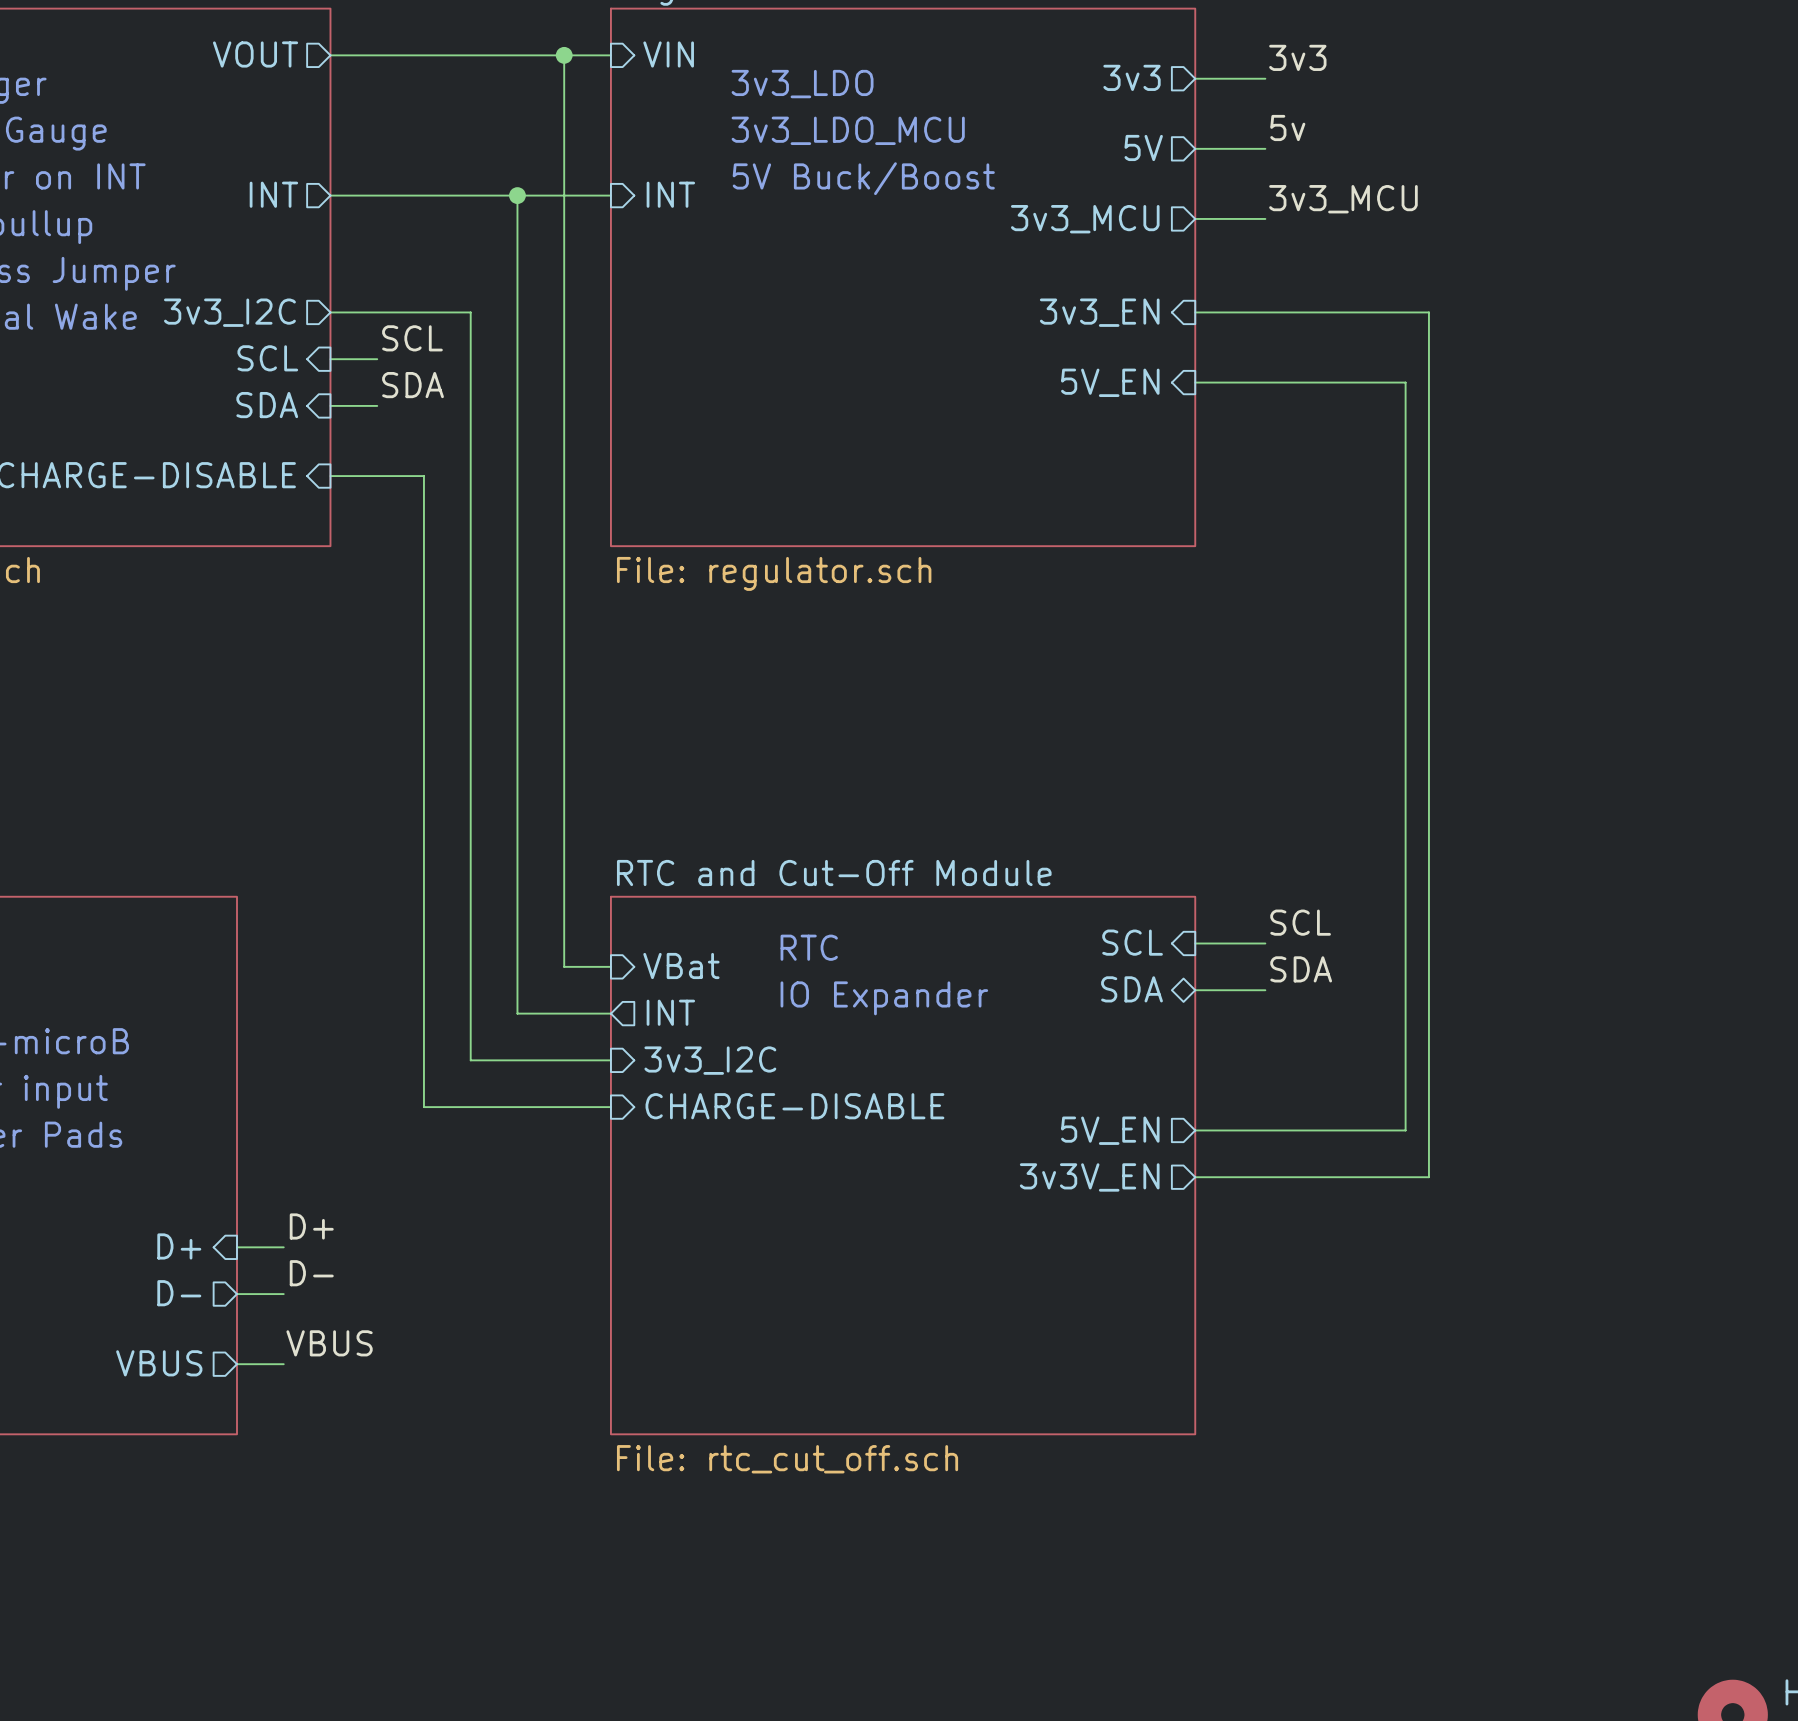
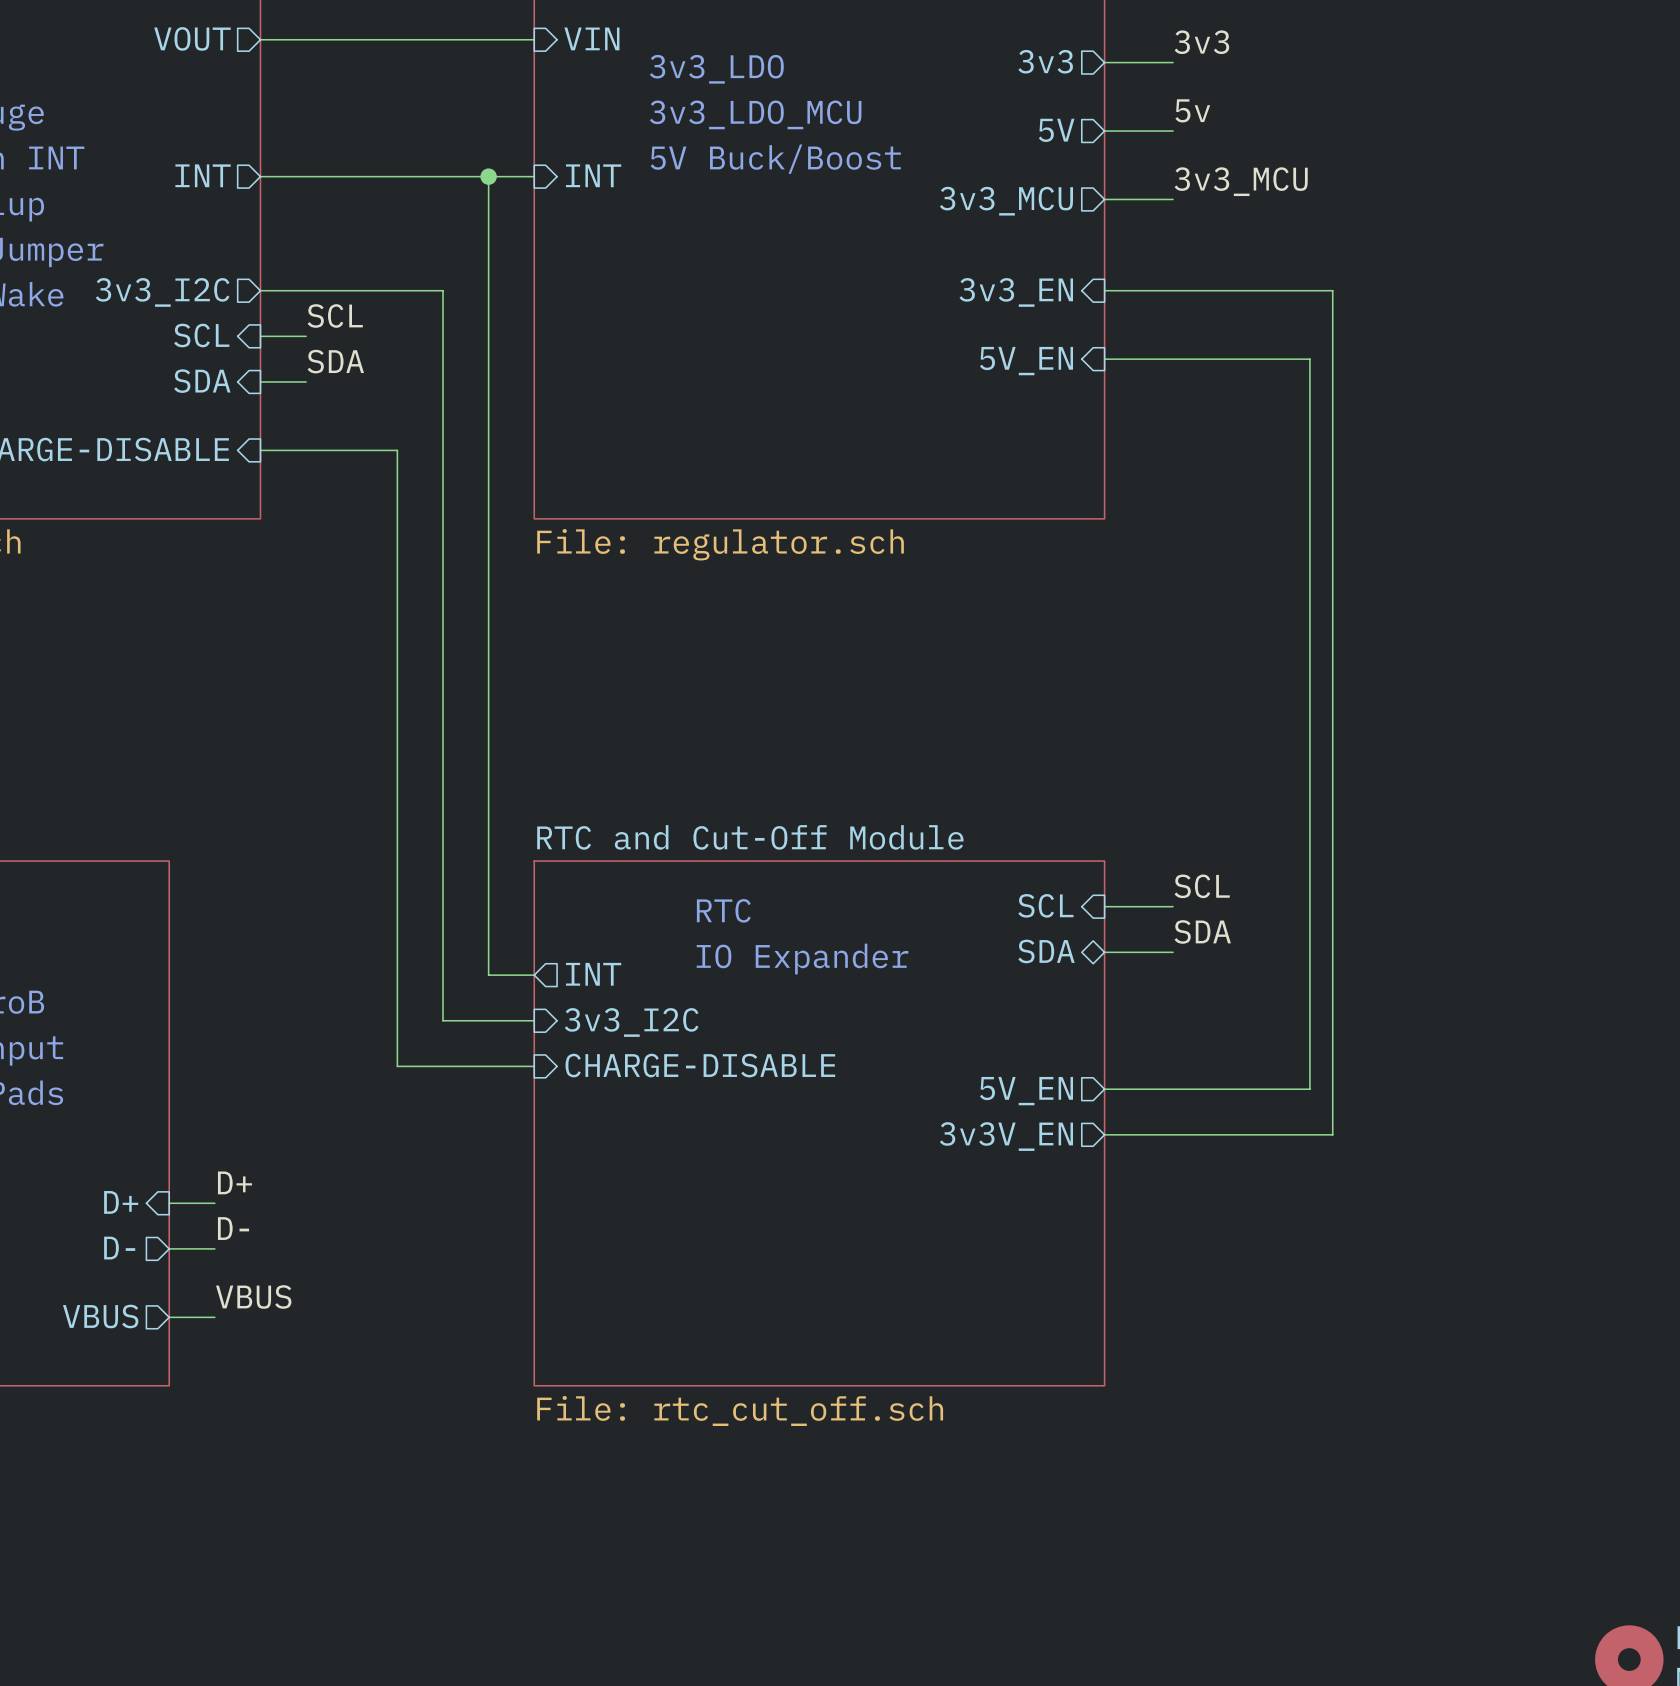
wire: (564, 55) (564, 195) -> none
junction: (564, 55) -> none
wire: (517, 195) (517, 312) -> (397, 290) (442, 290)
junction position: (517, 195) -> (488, 176)
wire: (470, 312) (470, 476) -> (351, 450) (397, 450)
wire: (423, 476) (423, 1107) (470, 1107) -> (397, 1020) (397, 1066)
sheet pin: VBat (681, 965) -> none
wire: (564, 966) (610, 966) -> (488, 929) (488, 975)
wire: (517, 1013) (564, 1013) -> none
wire: (470, 1060) (517, 1060) -> (442, 975) (442, 1020)

